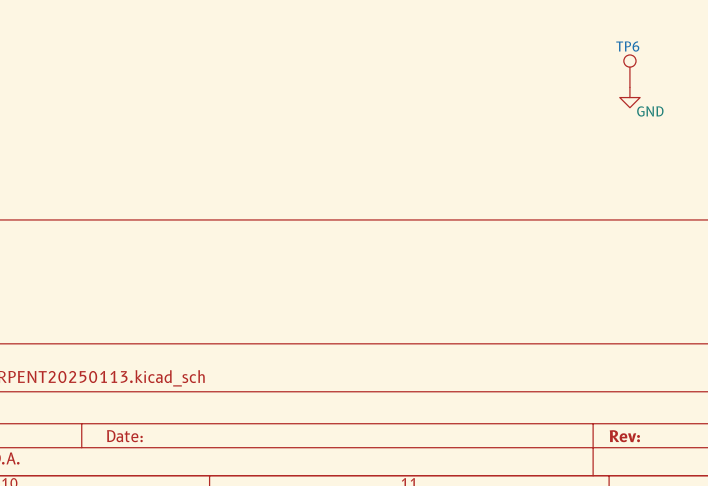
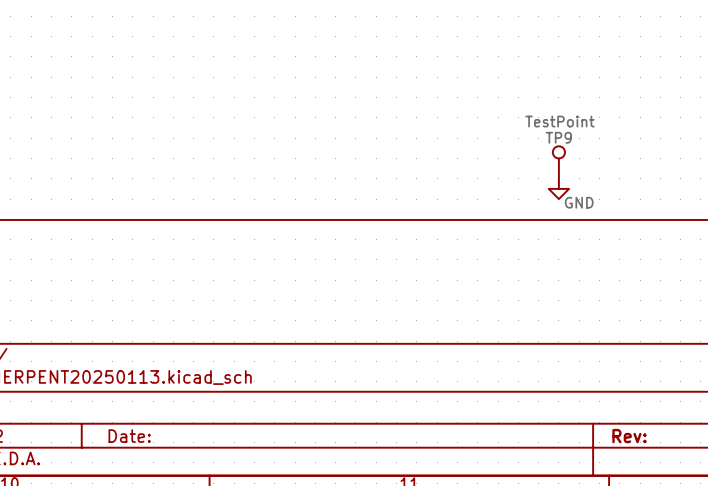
TP6: (629, 71) -> none
power symbol position: GND (629, 97) -> GND (558, 188)
TP9: none -> TestPoint (558, 162)

